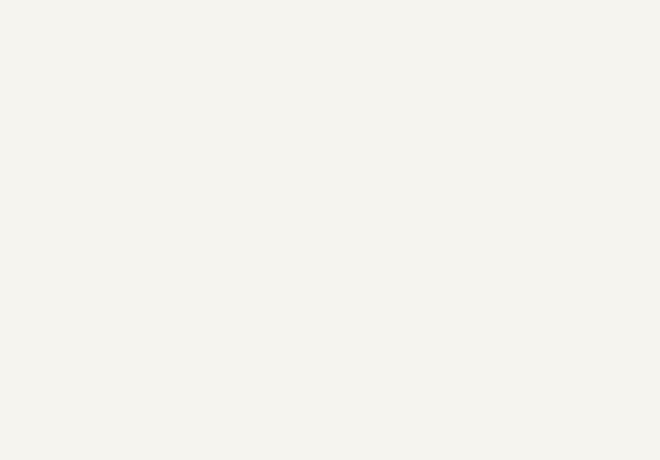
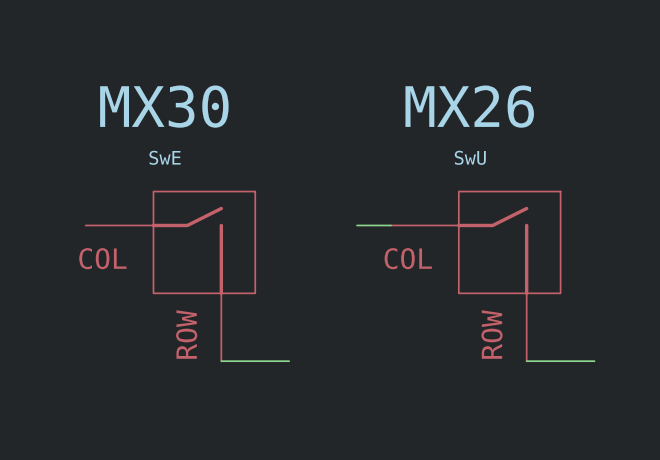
wire: none -> (357, 225) (390, 225)
MX30: none -> SwE (170, 276)
MX26: none -> SwU (475, 276)
wire: none -> (221, 361) (289, 361)
wire: none -> (526, 361) (594, 361)

